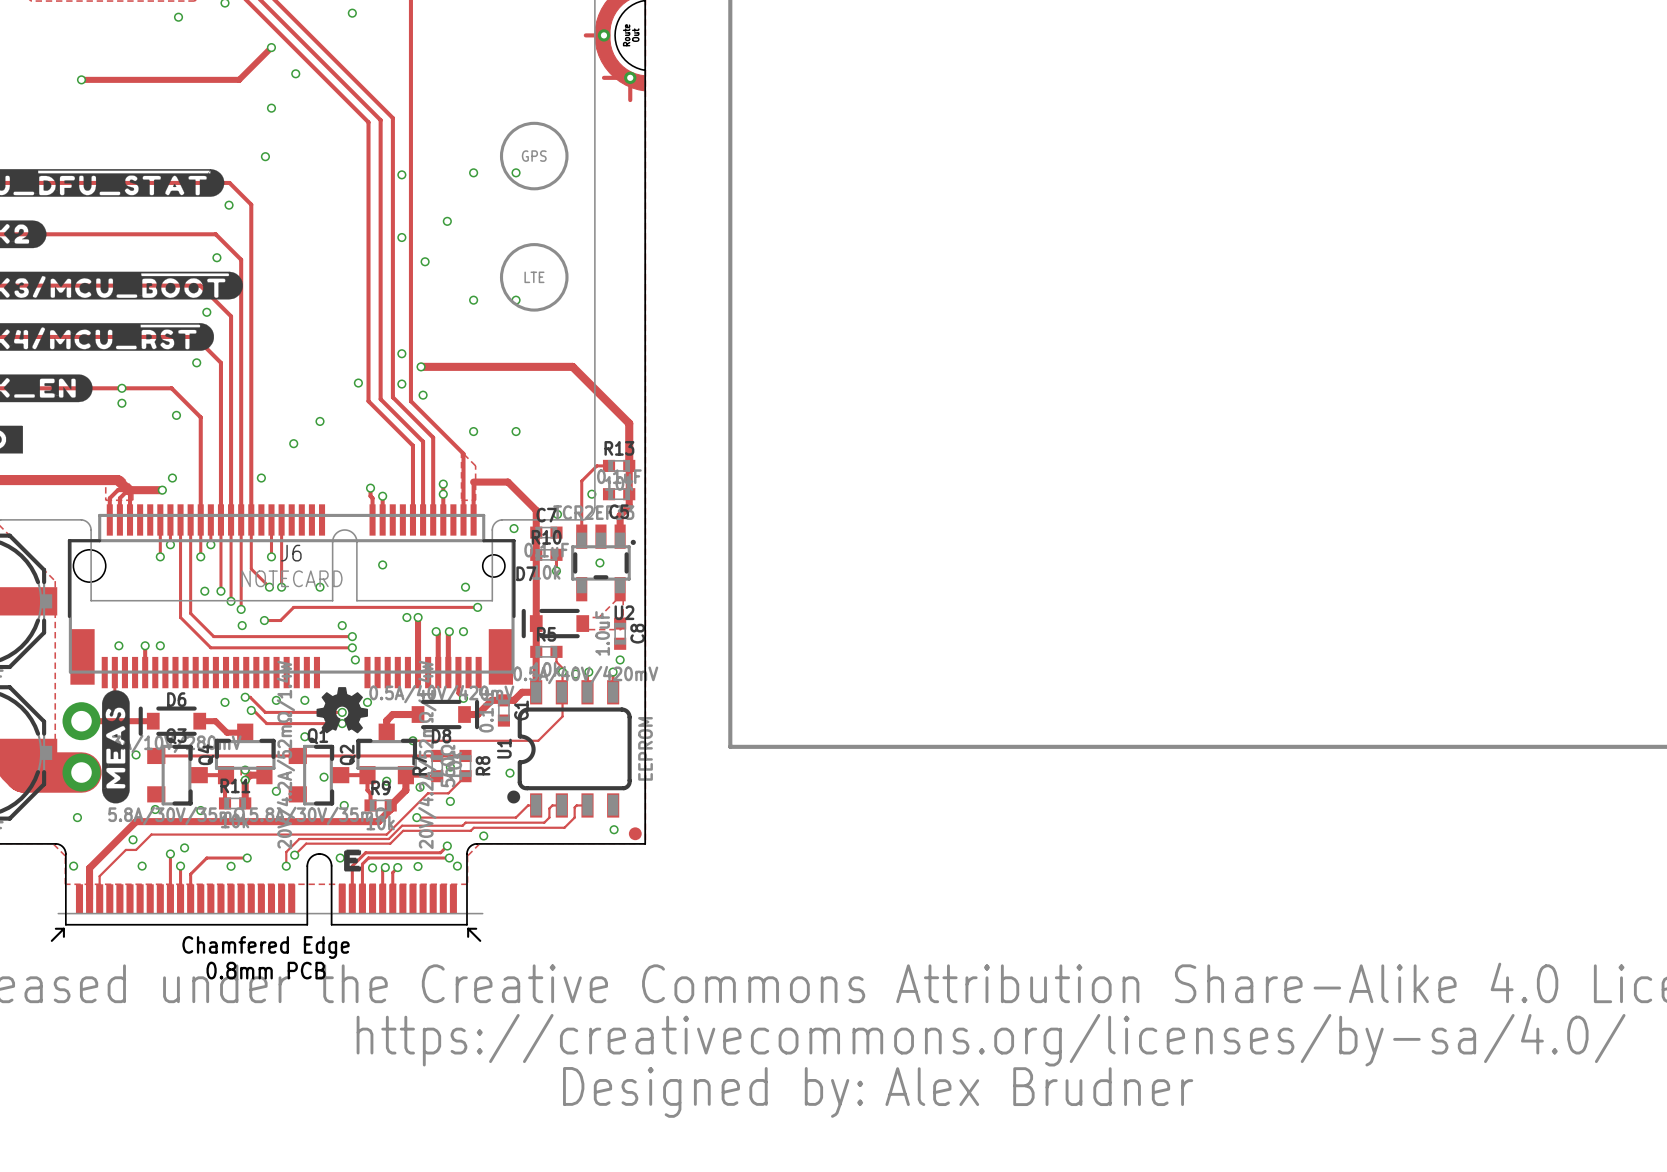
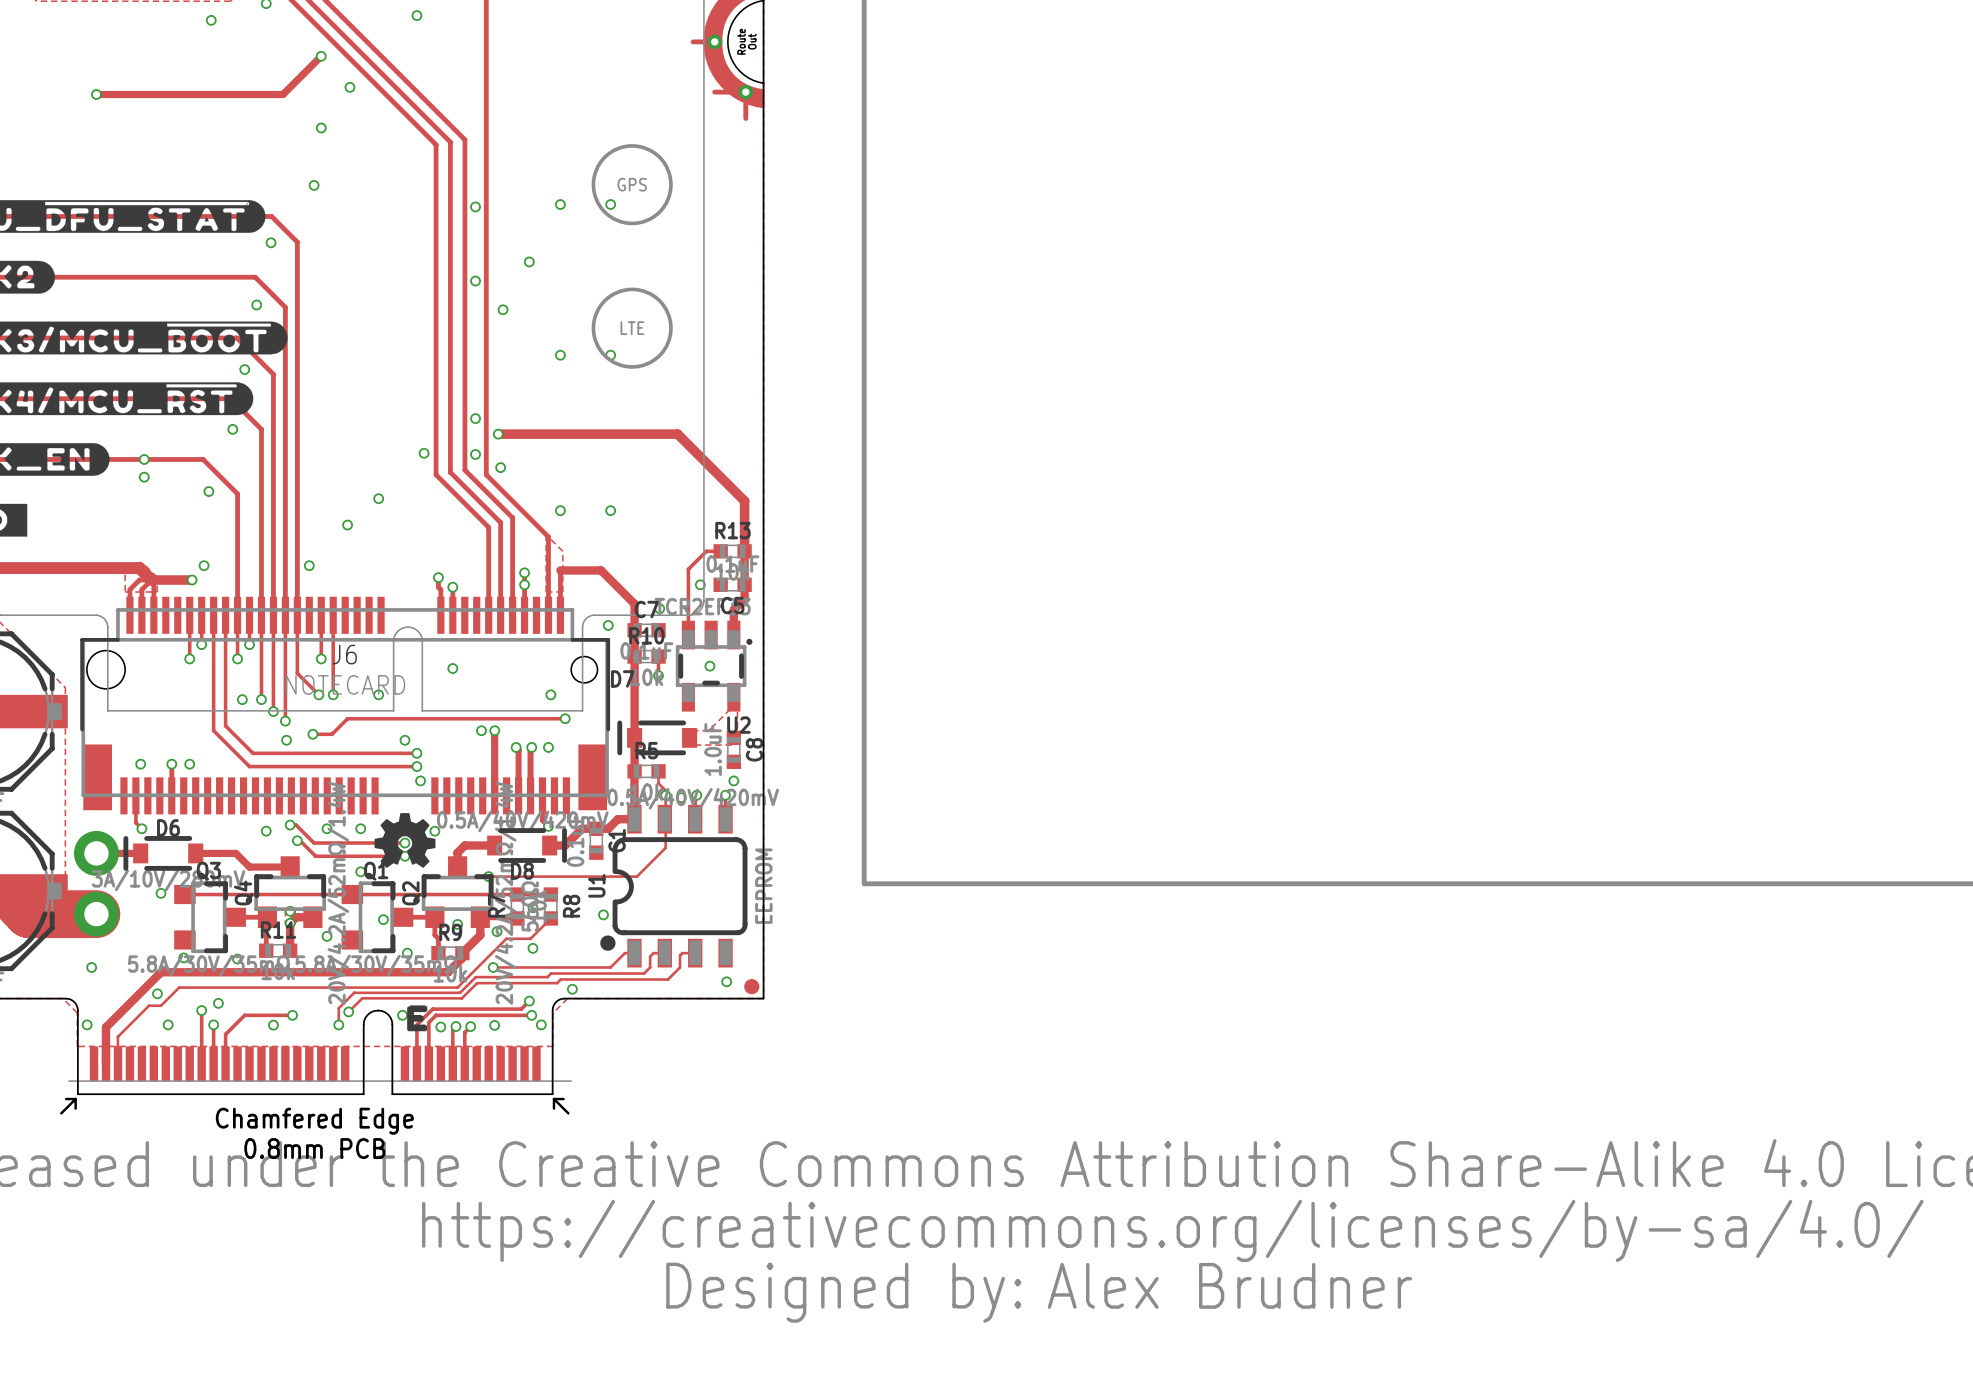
drawing: [102, 690, 130, 804] -> none
track: (118, 721) (153, 721) -> none
D6 position: (172, 721) -> (163, 853)
track: (199, 721) (215, 721) (227, 732) -> (195, 853) (235, 853) (249, 867) (268, 867)

